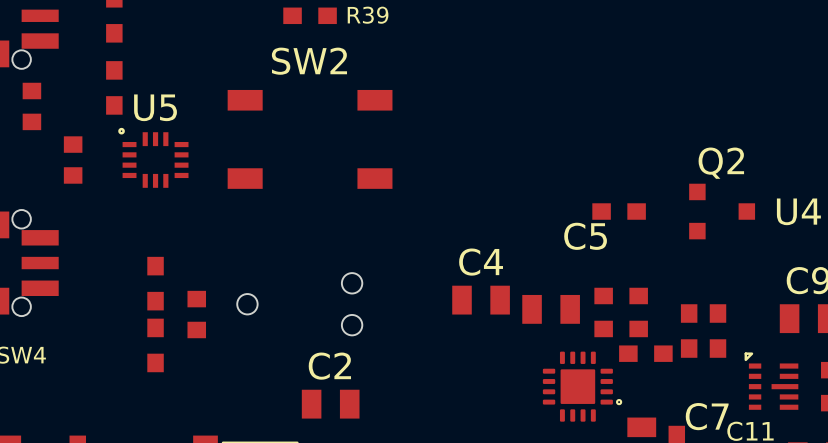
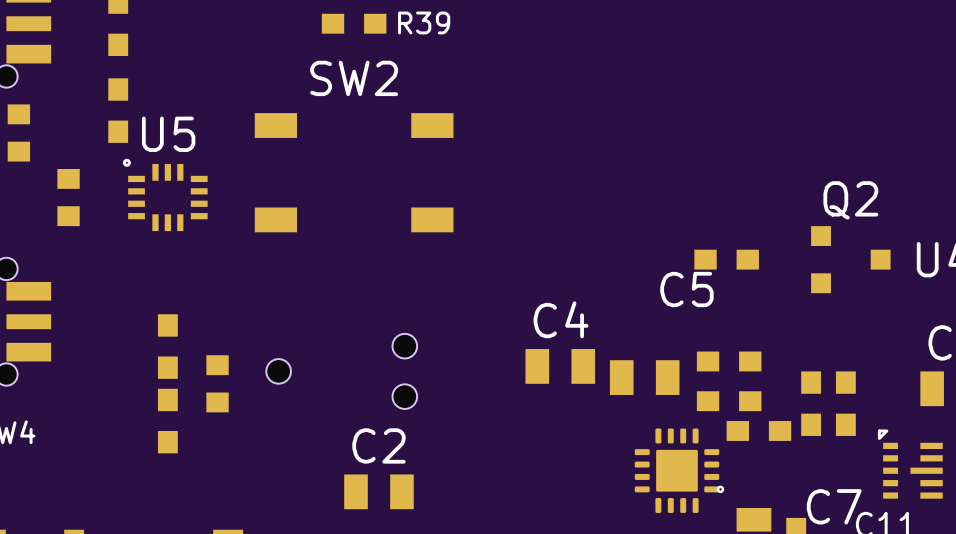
part footprint: [542, 351, 623, 422] -> [634, 428, 725, 513]

